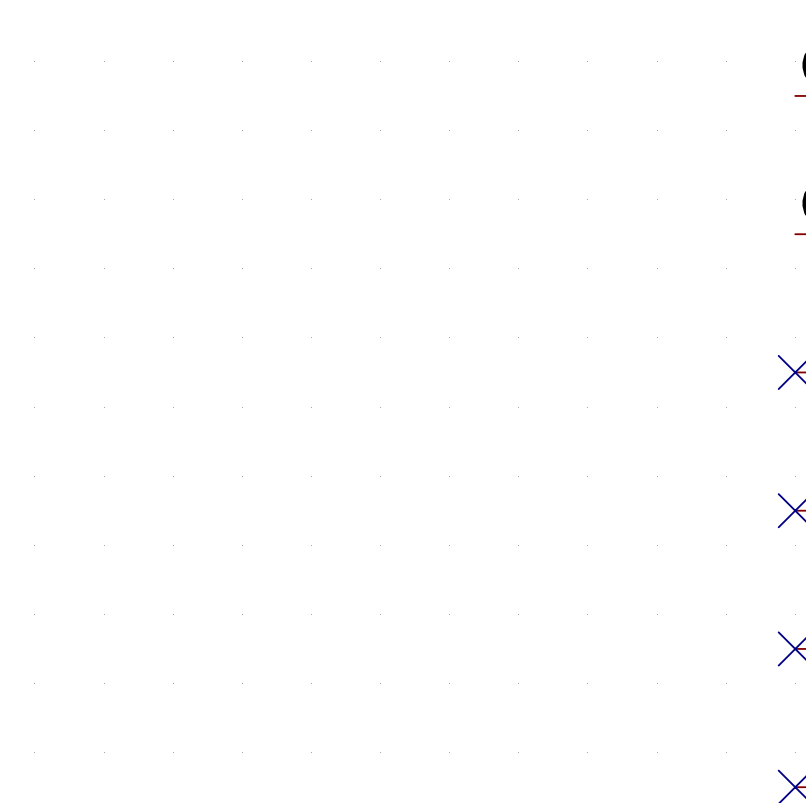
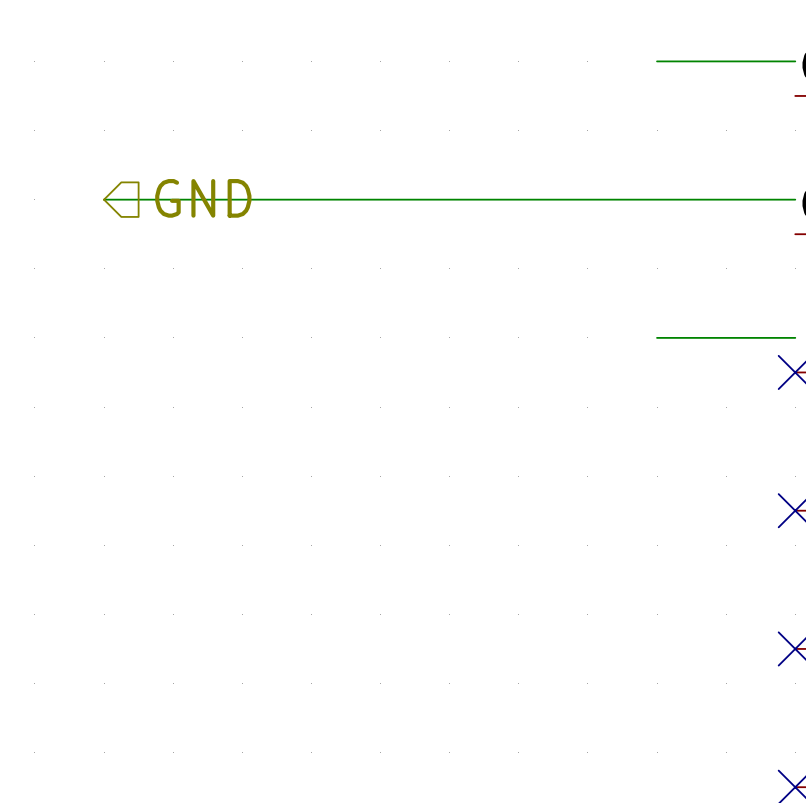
wire: none -> (657, 61) (795, 61)
hierarchical label: none -> GND (203, 198)
wire: none -> (104, 199) (795, 199)
wire: none -> (657, 337) (795, 337)

